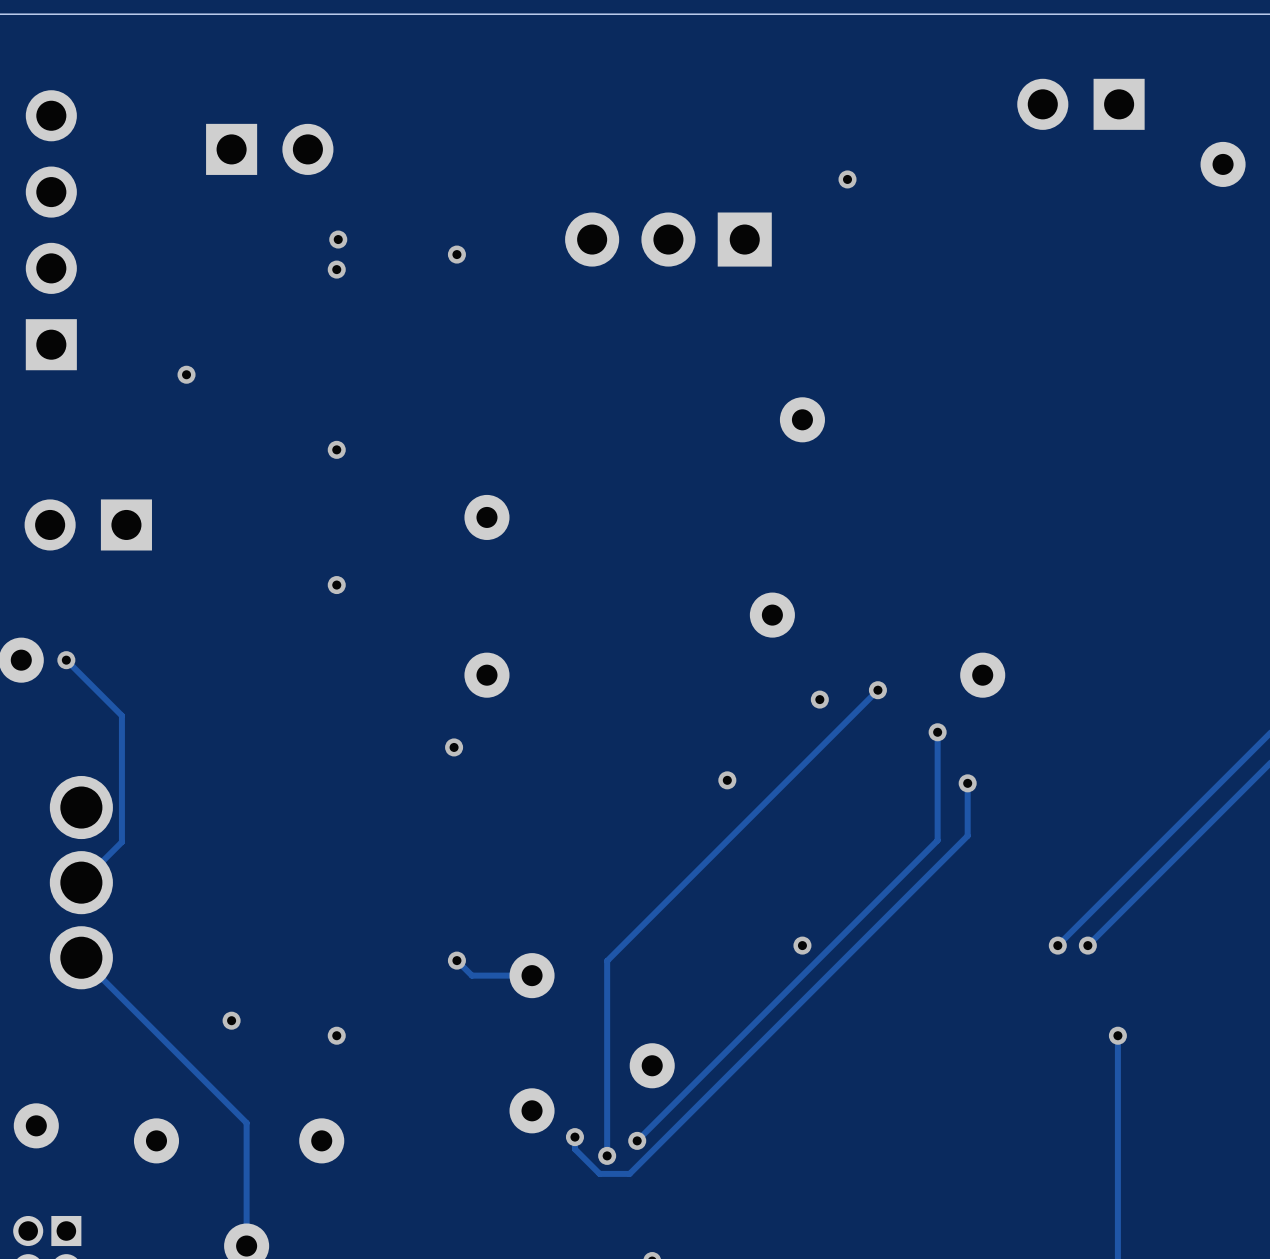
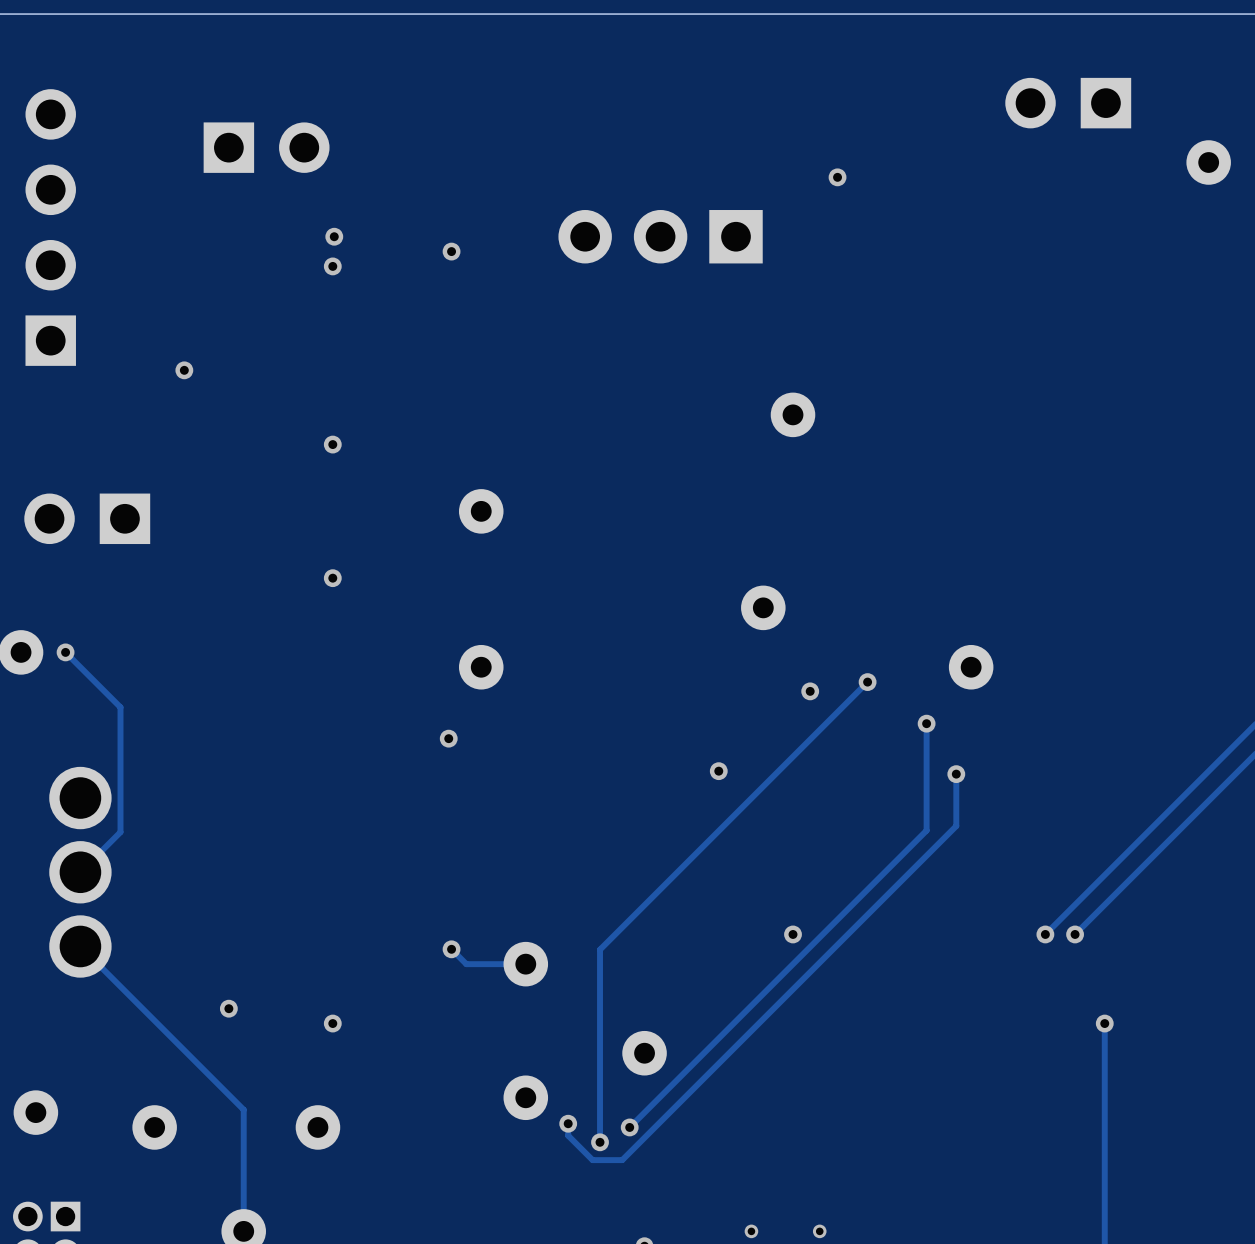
via: none -> (751, 1231)
via: none -> (819, 1231)

